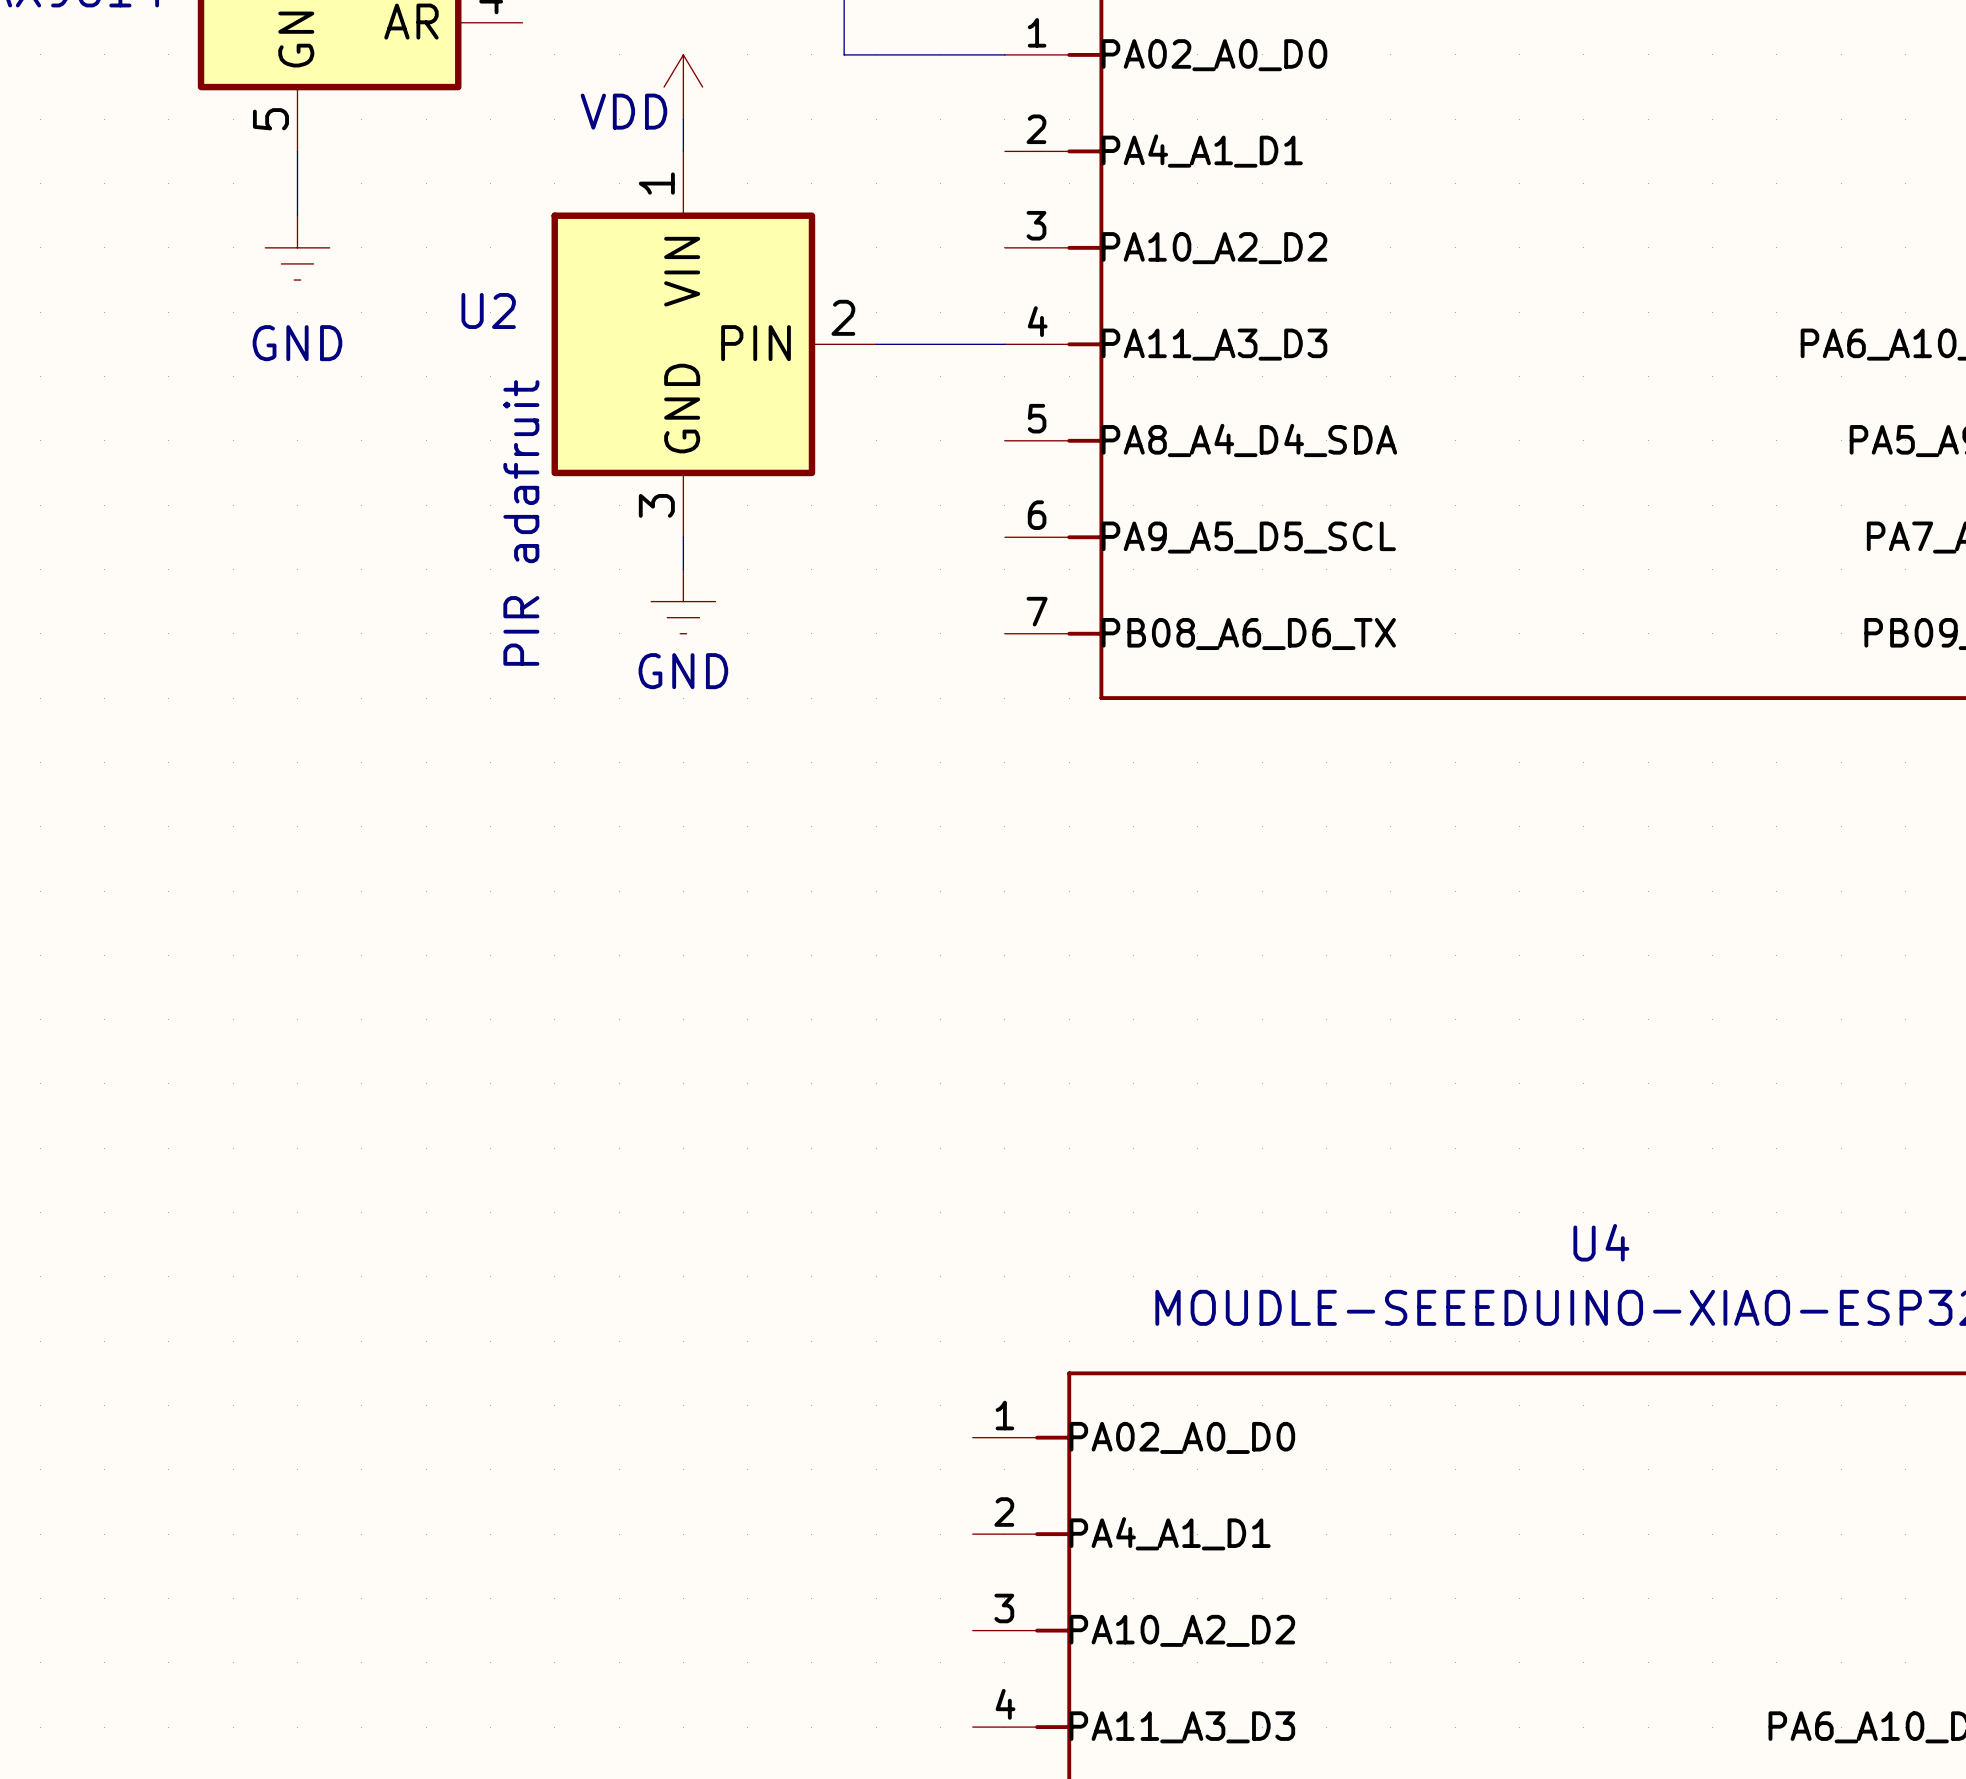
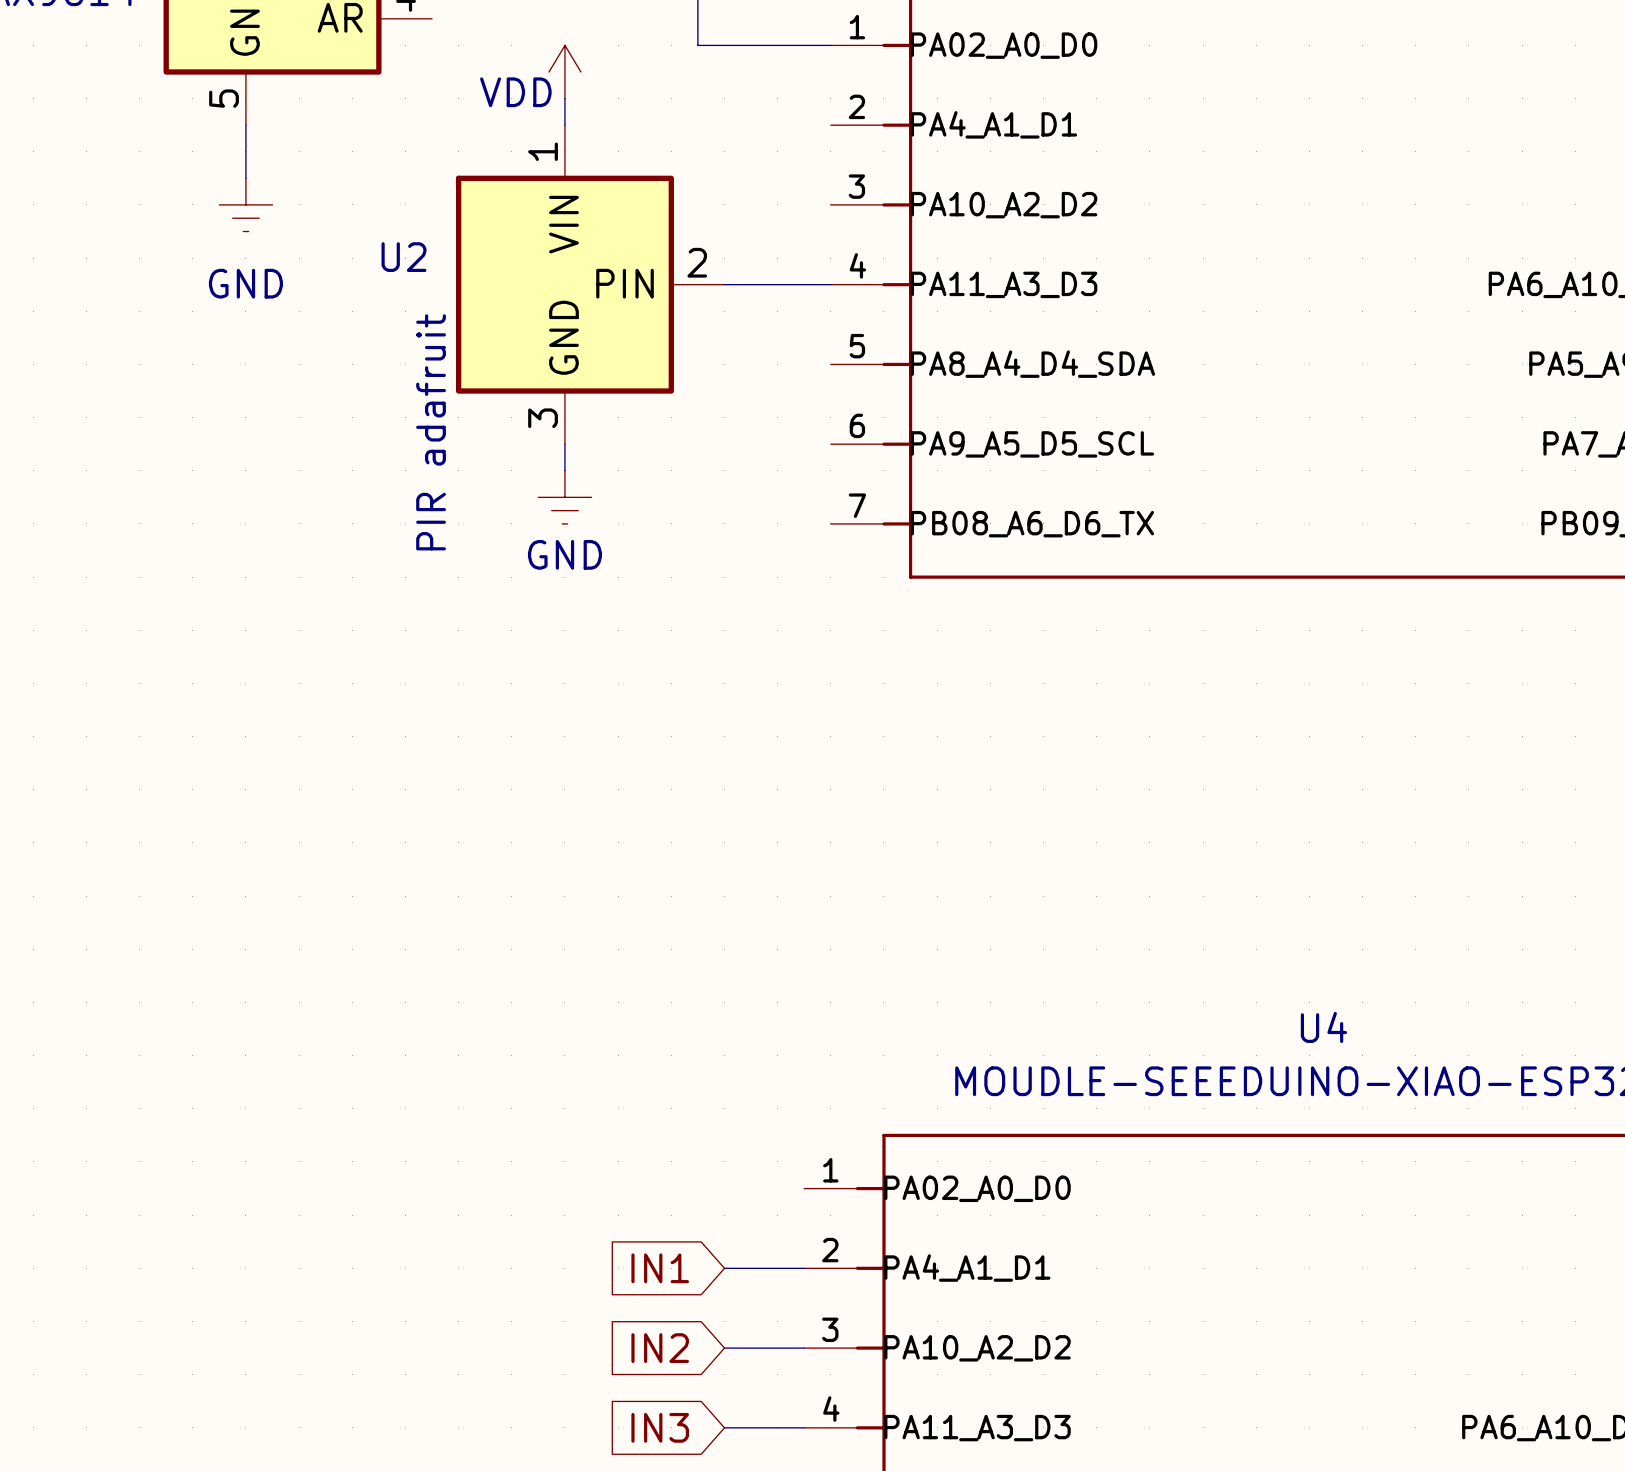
global label: none -> IN1 (660, 1268)
wire: none -> (724, 1268) (804, 1268)
global label: none -> IN2 (660, 1348)
wire: none -> (724, 1348) (804, 1348)
global label: none -> IN3 (660, 1427)
wire: none -> (724, 1427) (804, 1427)

